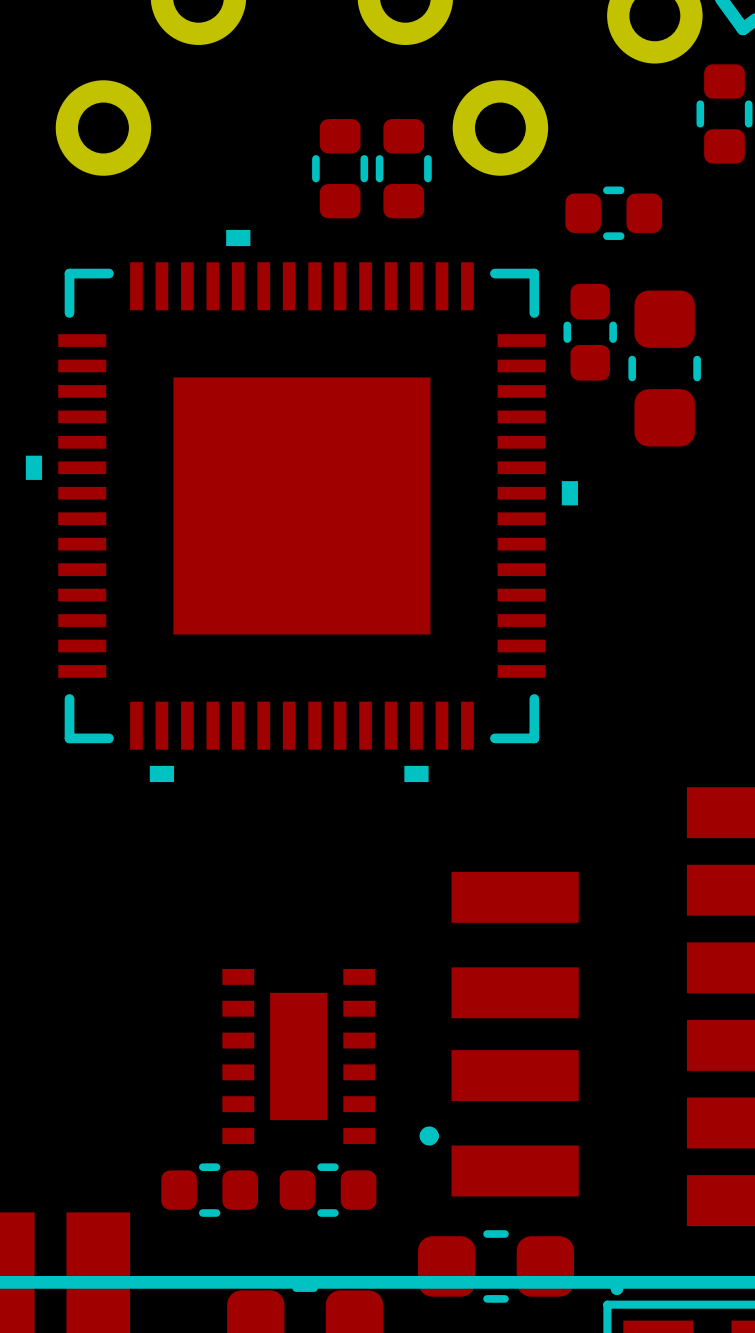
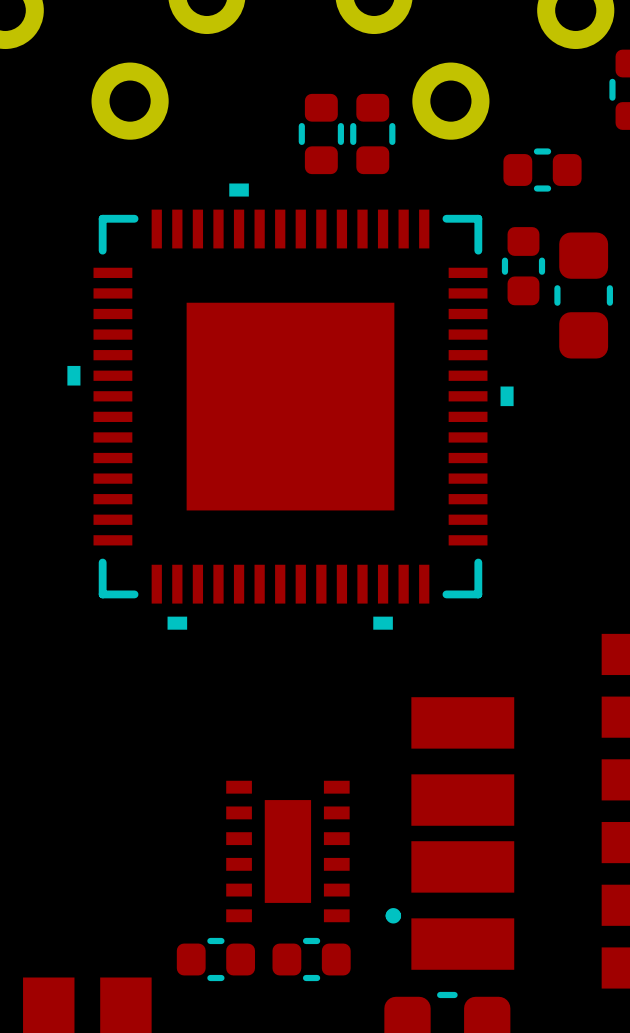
part footprint: [451, 871, 579, 1019] -> [411, 697, 515, 826]
part footprint: [451, 1050, 579, 1197] -> [411, 841, 515, 970]

